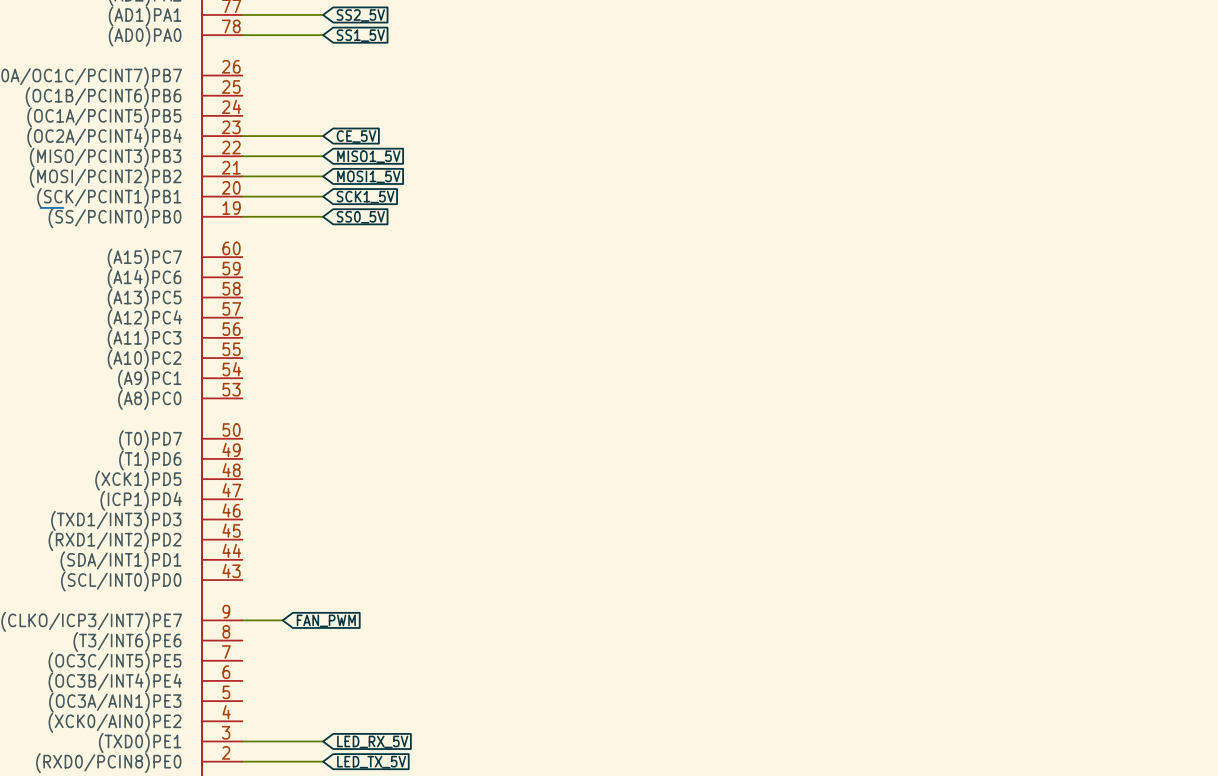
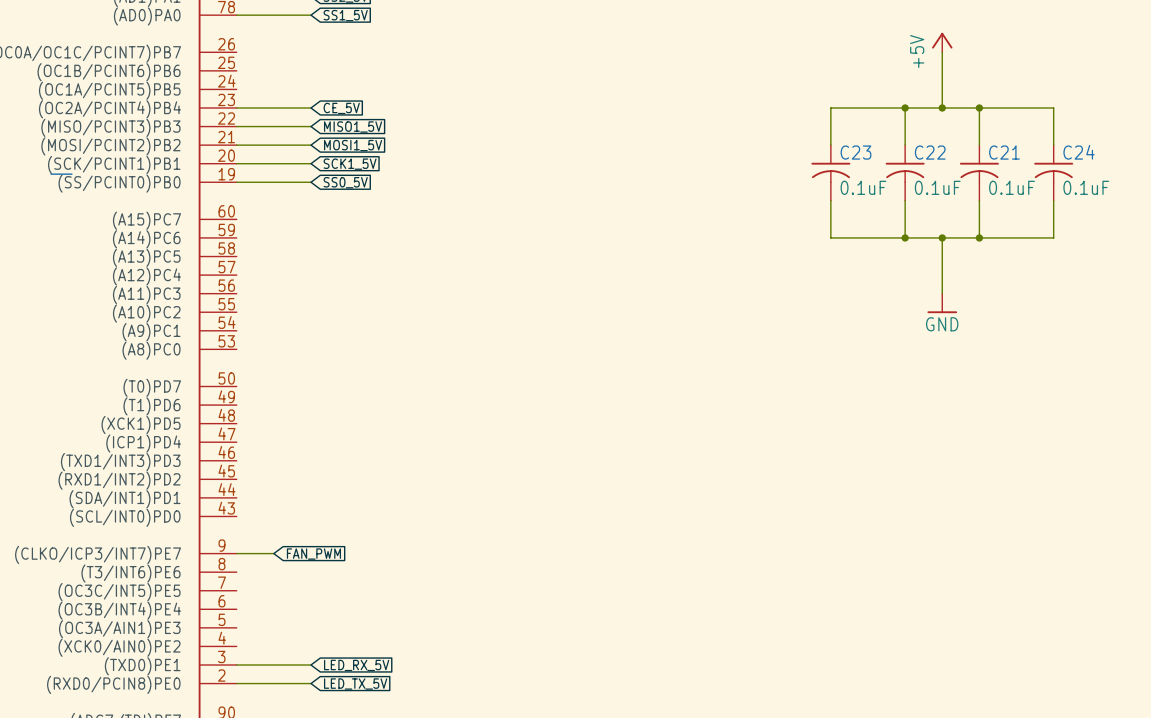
power symbol: none -> +5V (942, 42)
wire: none -> (942, 52) (942, 107)
wire: none -> (905, 107) (905, 145)
junction: none -> (905, 107)
junction: none -> (942, 107)
wire: none -> (979, 107) (979, 145)
junction: none -> (979, 107)
wire: none -> (830, 145) (830, 107) (1053, 107) (1053, 145)
C23: none -> 0.1uF (830, 172)
C22: none -> 0.1uF (905, 172)
C21: none -> 0.1uF (979, 172)
C24: none -> 0.1uF (1053, 172)
wire: none -> (830, 200) (830, 237) (1053, 237) (1053, 200)
wire: none -> (905, 200) (905, 237)
wire: none -> (979, 200) (979, 237)
junction: none -> (905, 237)
wire: none -> (942, 237) (942, 293)
junction: none -> (942, 237)
junction: none -> (979, 237)
power symbol: none -> GND (942, 303)

